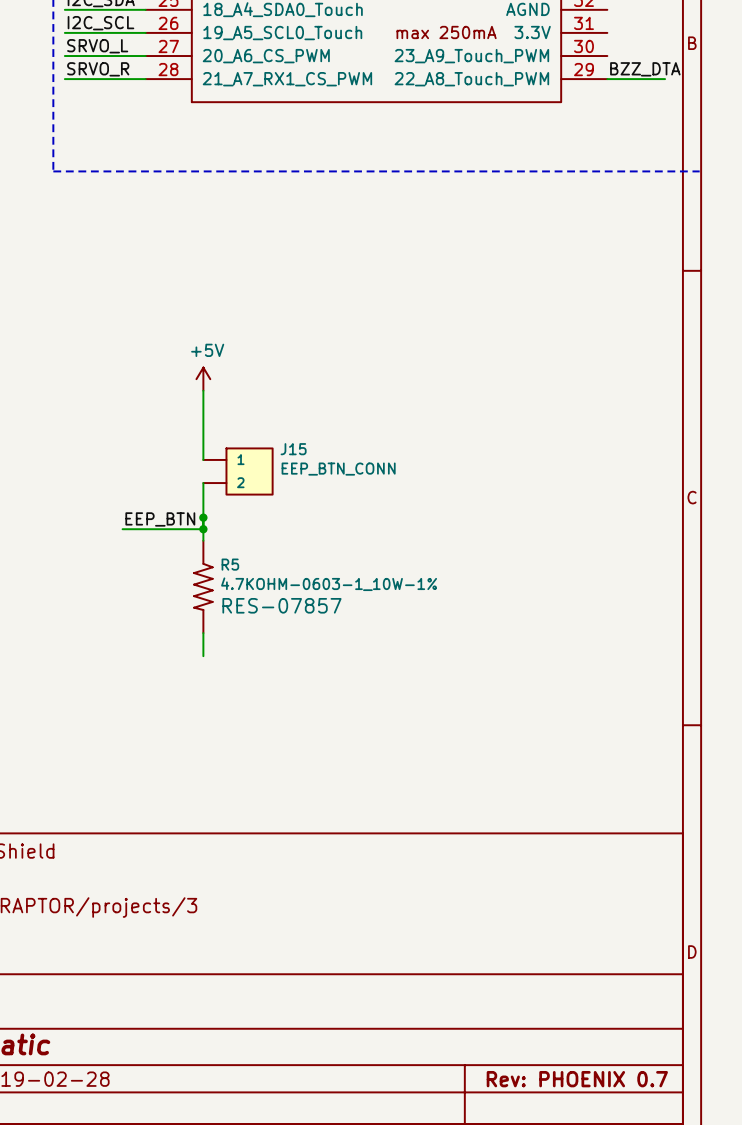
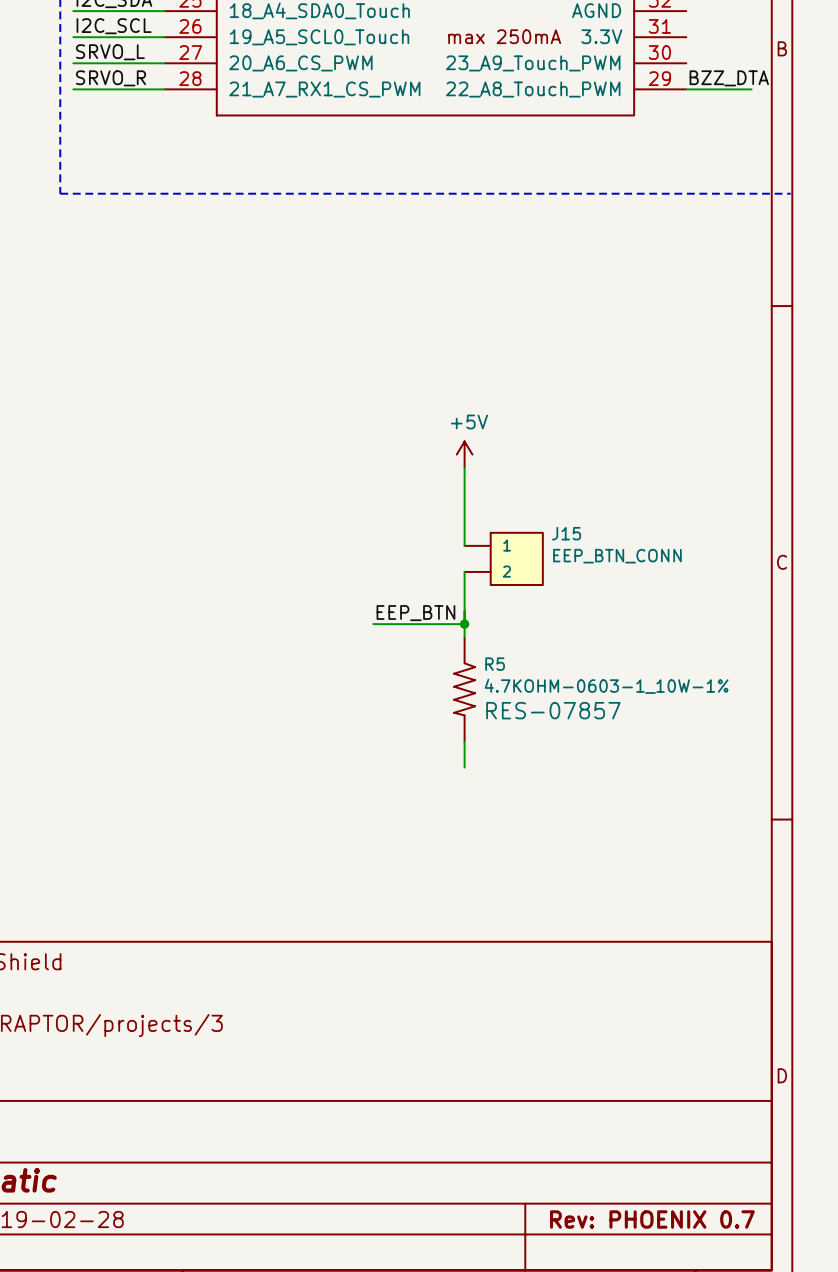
power symbol position: +5V (203, 379) -> +5V (464, 454)
wire: (203, 390) (203, 459) -> (464, 467) (464, 545)
J15 position: (238, 471) -> (503, 558)
wire: (203, 483) (203, 540) -> (464, 571) (464, 637)
junction: (203, 517) -> none
label position: EEP_BTN (160, 519) -> EEP_BTN (415, 613)
wire: (122, 529) (203, 529) -> (373, 624) (464, 624)
junction: (203, 529) -> none
junction: none -> (464, 624)
R5 position: (203, 586) -> (464, 689)
wire: (203, 633) (203, 656) -> (464, 741) (464, 767)

